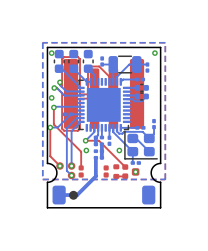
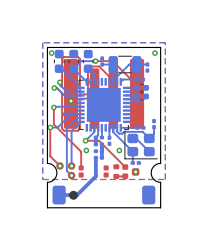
bottom track: none -> (95, 61) (81, 61) (73, 68)
top track: none -> (95, 61) (112, 61) (137, 85) (137, 93)
via: none -> (95, 61)
via position: (51, 97) -> (71, 101)

